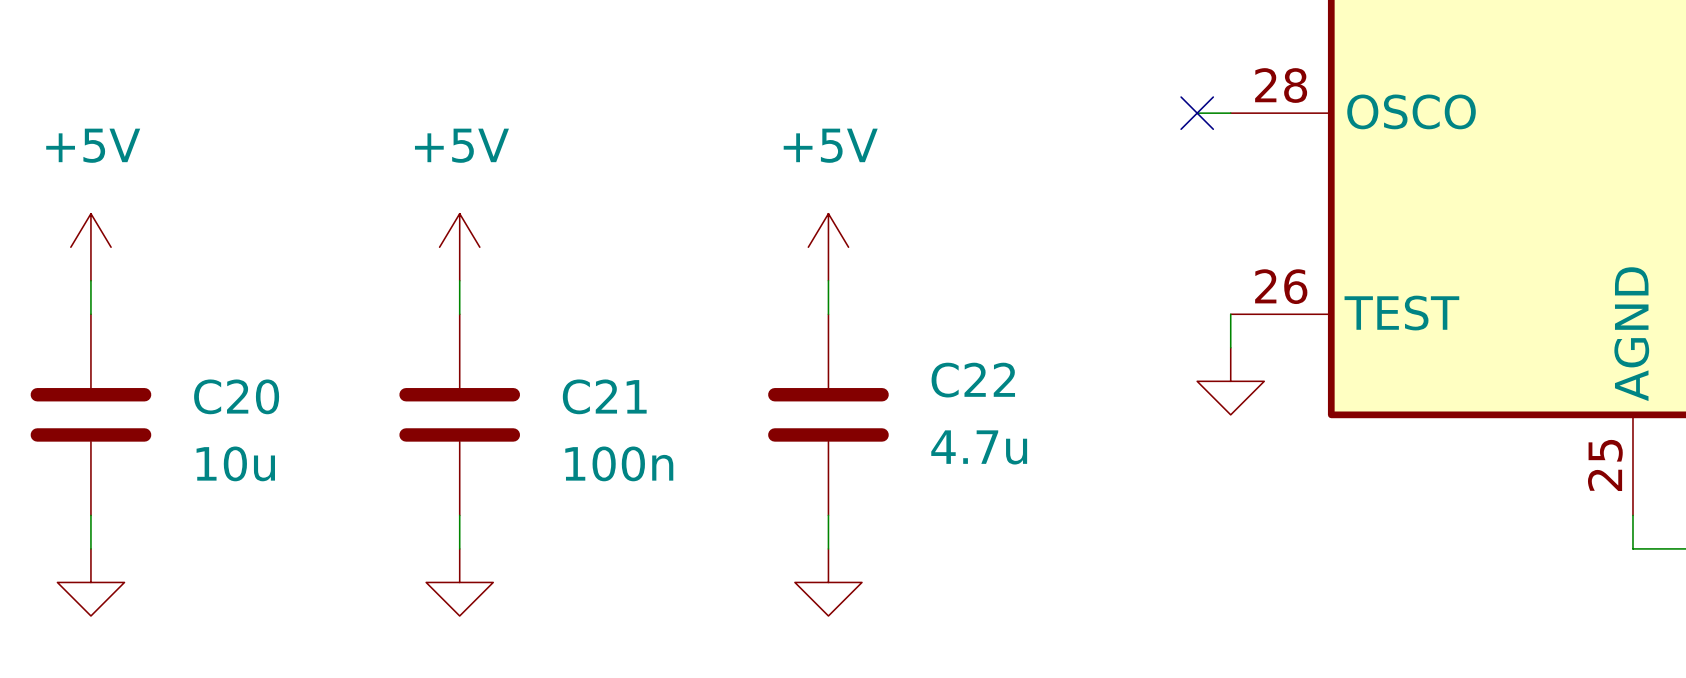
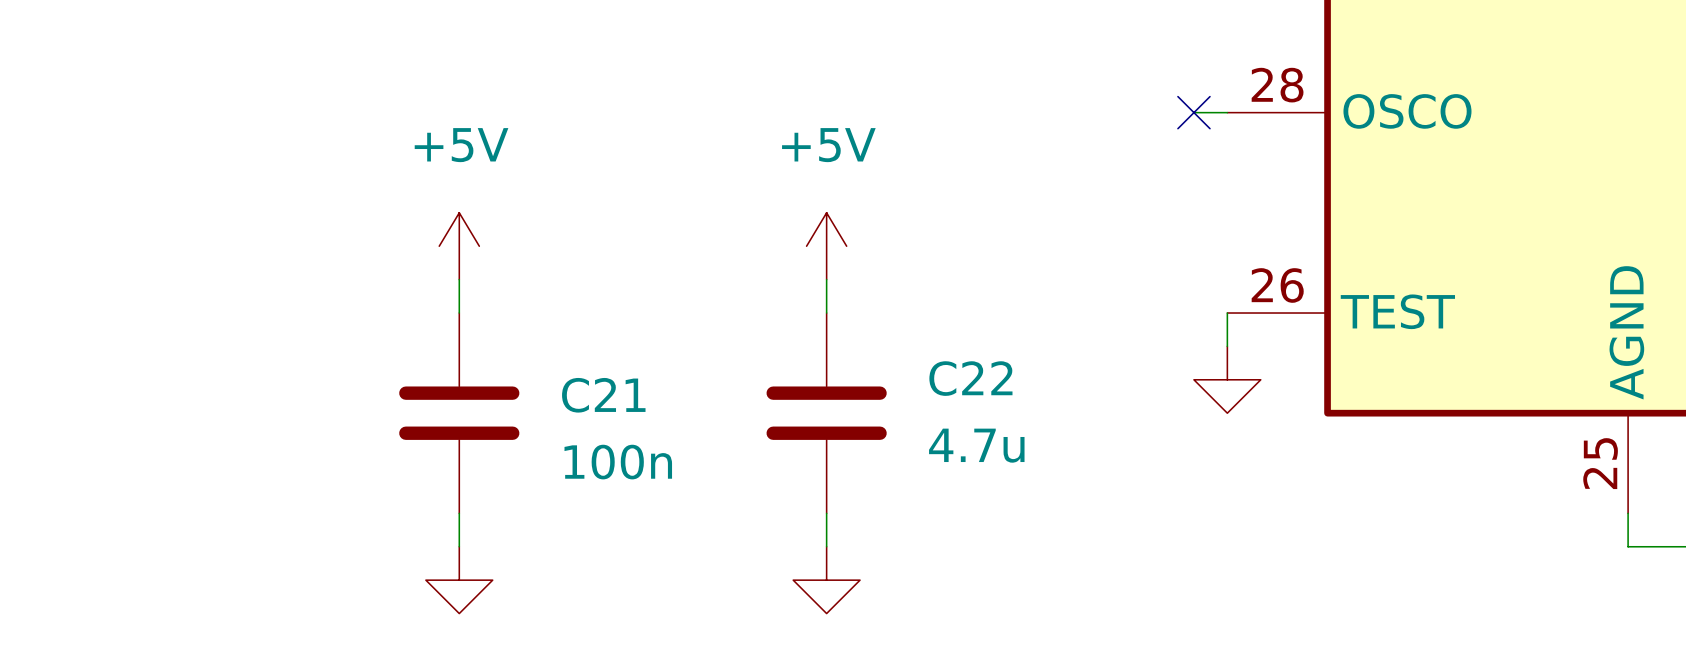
power symbol: +5V (90, 247) -> none
wire: (90, 280) (90, 314) -> none
C20: 10u (90, 414) -> none
wire: (90, 515) (90, 548) -> none
power symbol: (90, 582) -> none

